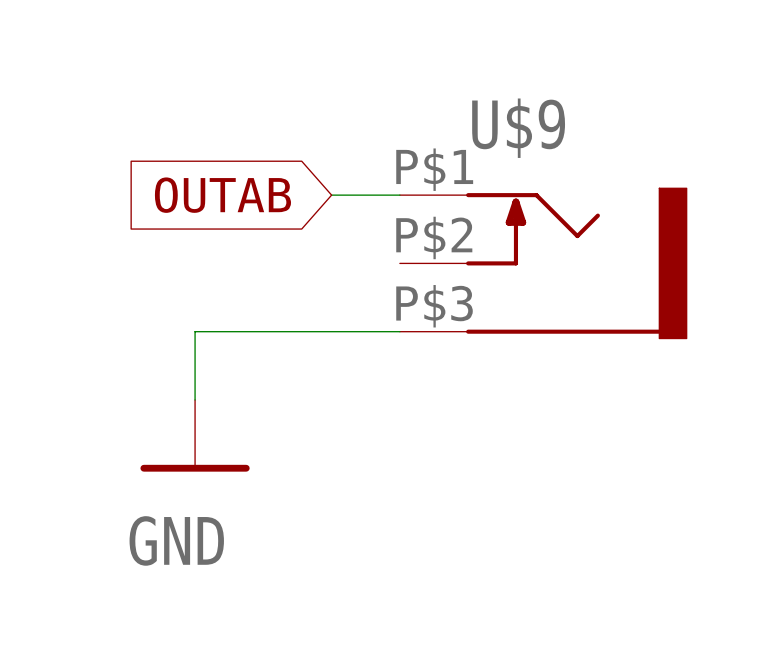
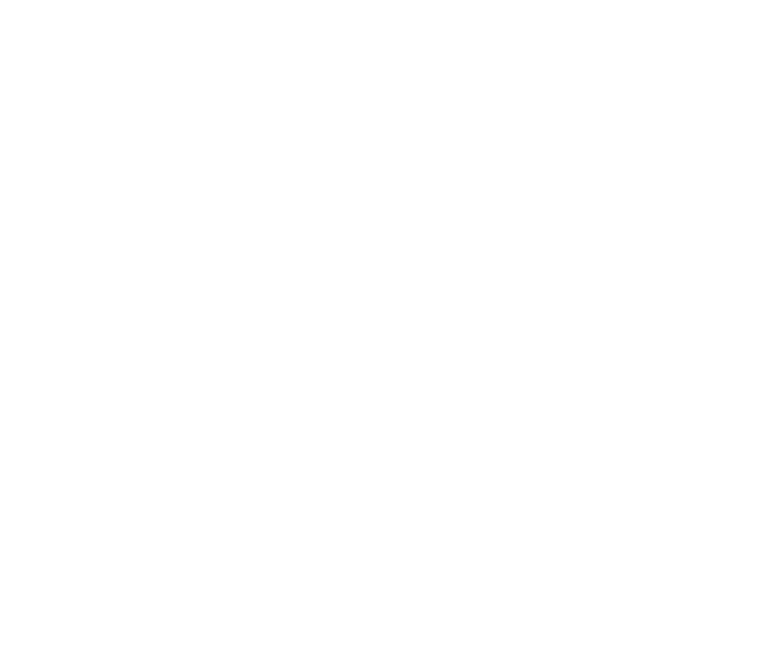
global label: OUTAB (222, 195) -> none
wire: (331, 195) (399, 195) -> none
U$9: (543, 263) -> none
wire: (399, 331) (195, 331) (195, 399) -> none
power symbol: GND (195, 435) -> none

